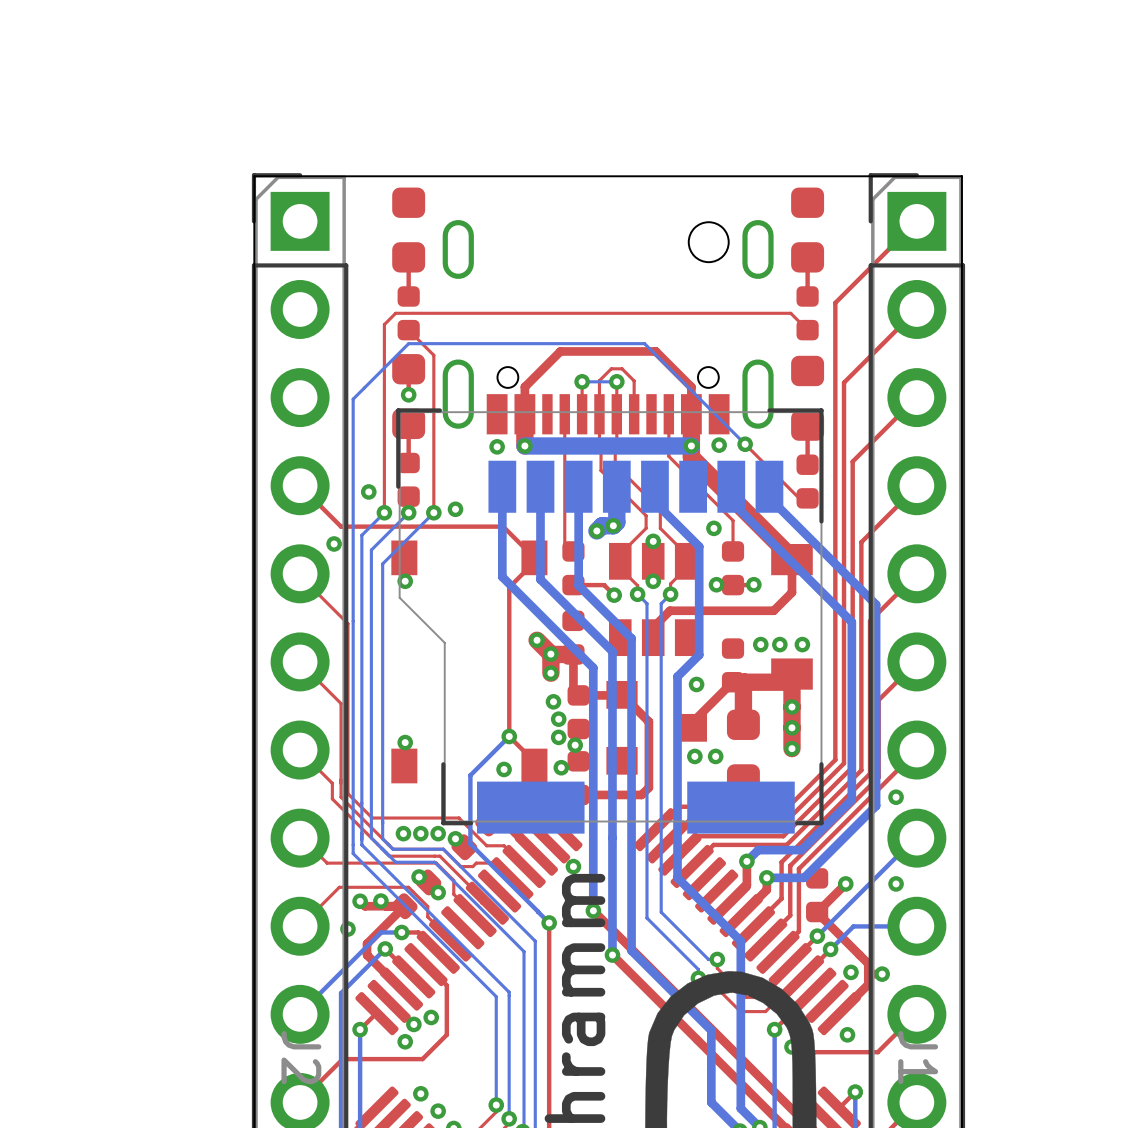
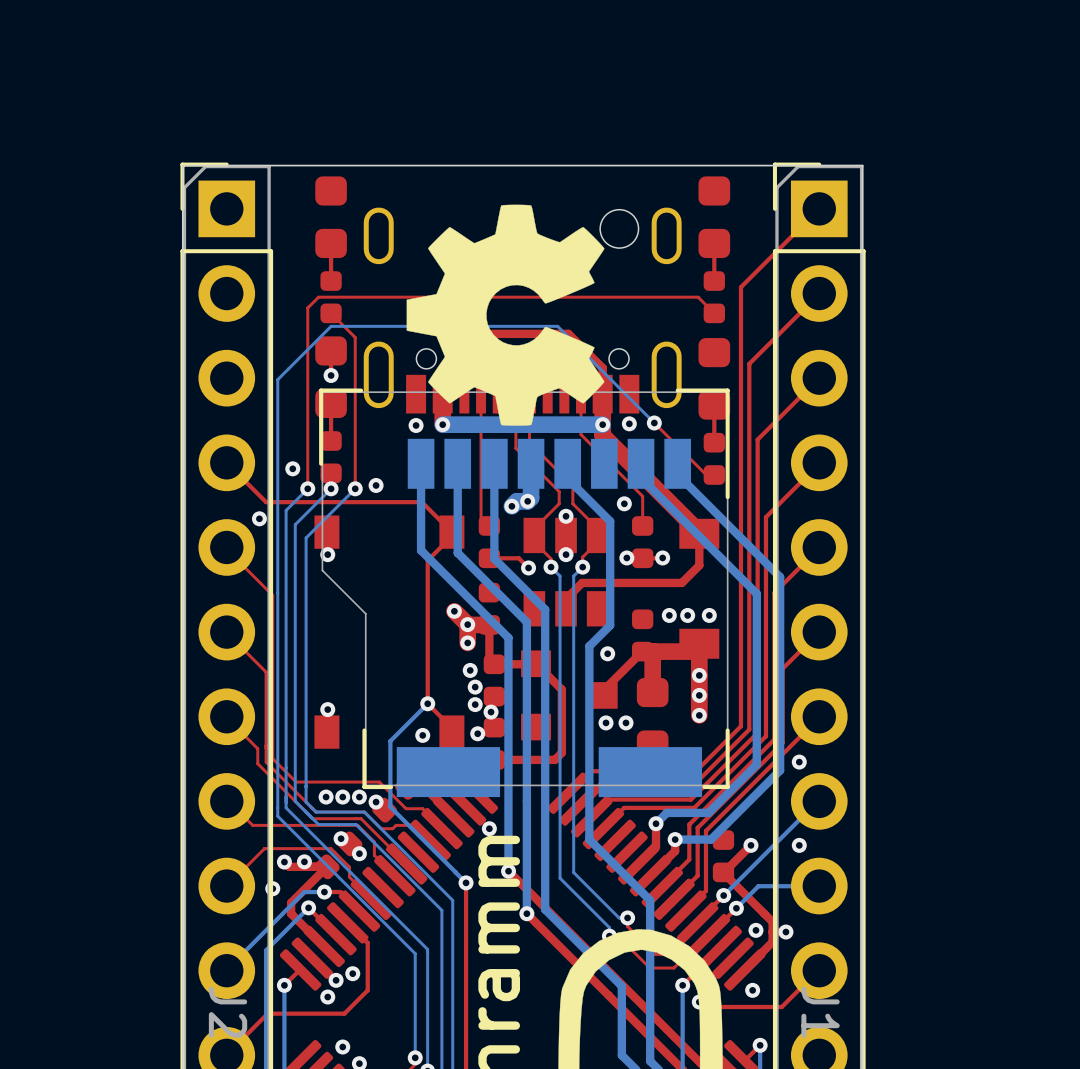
drawing: none -> [406, 204, 605, 426]

